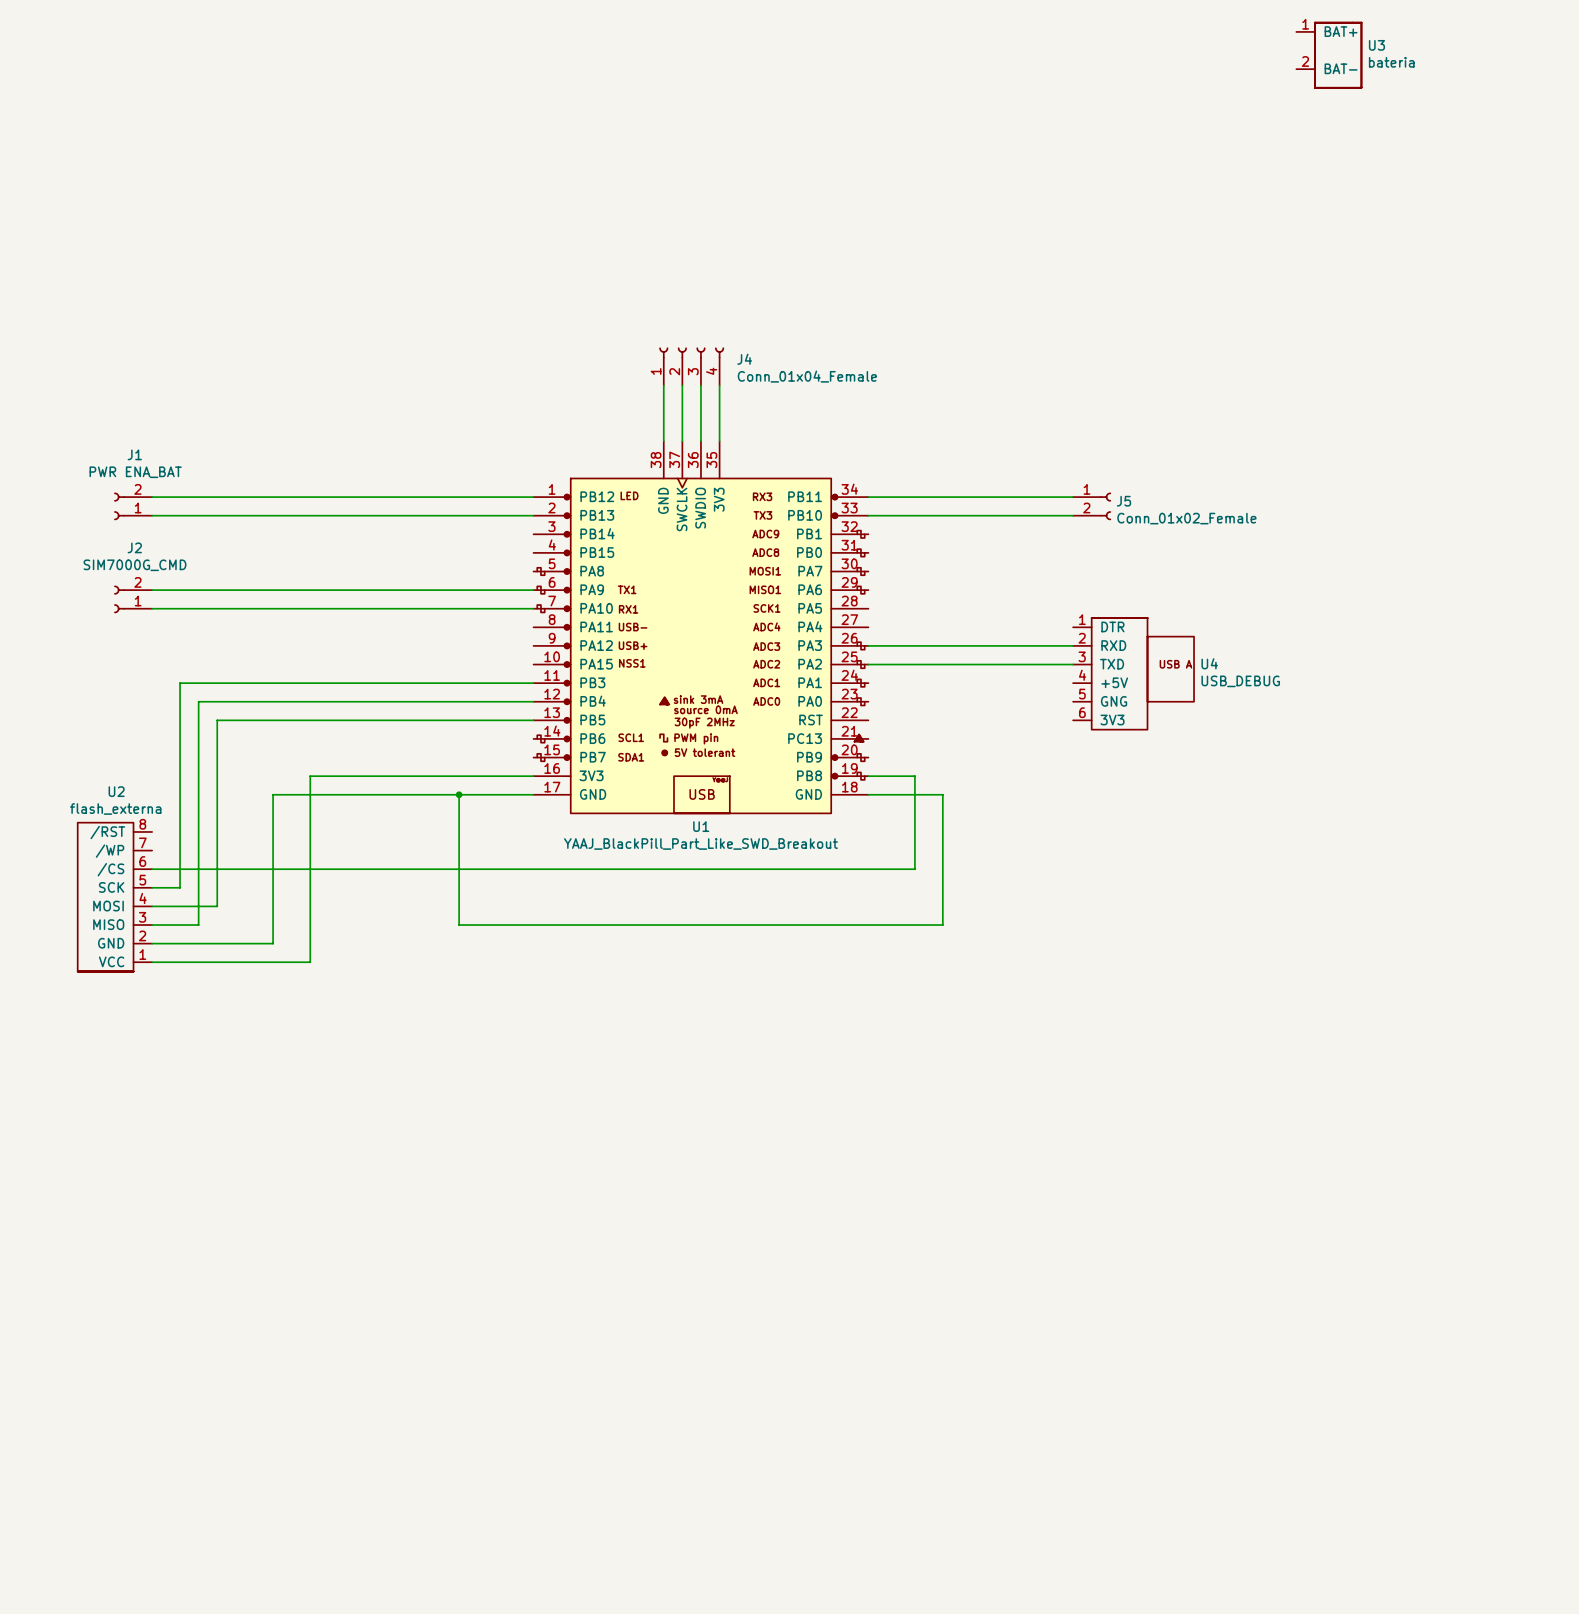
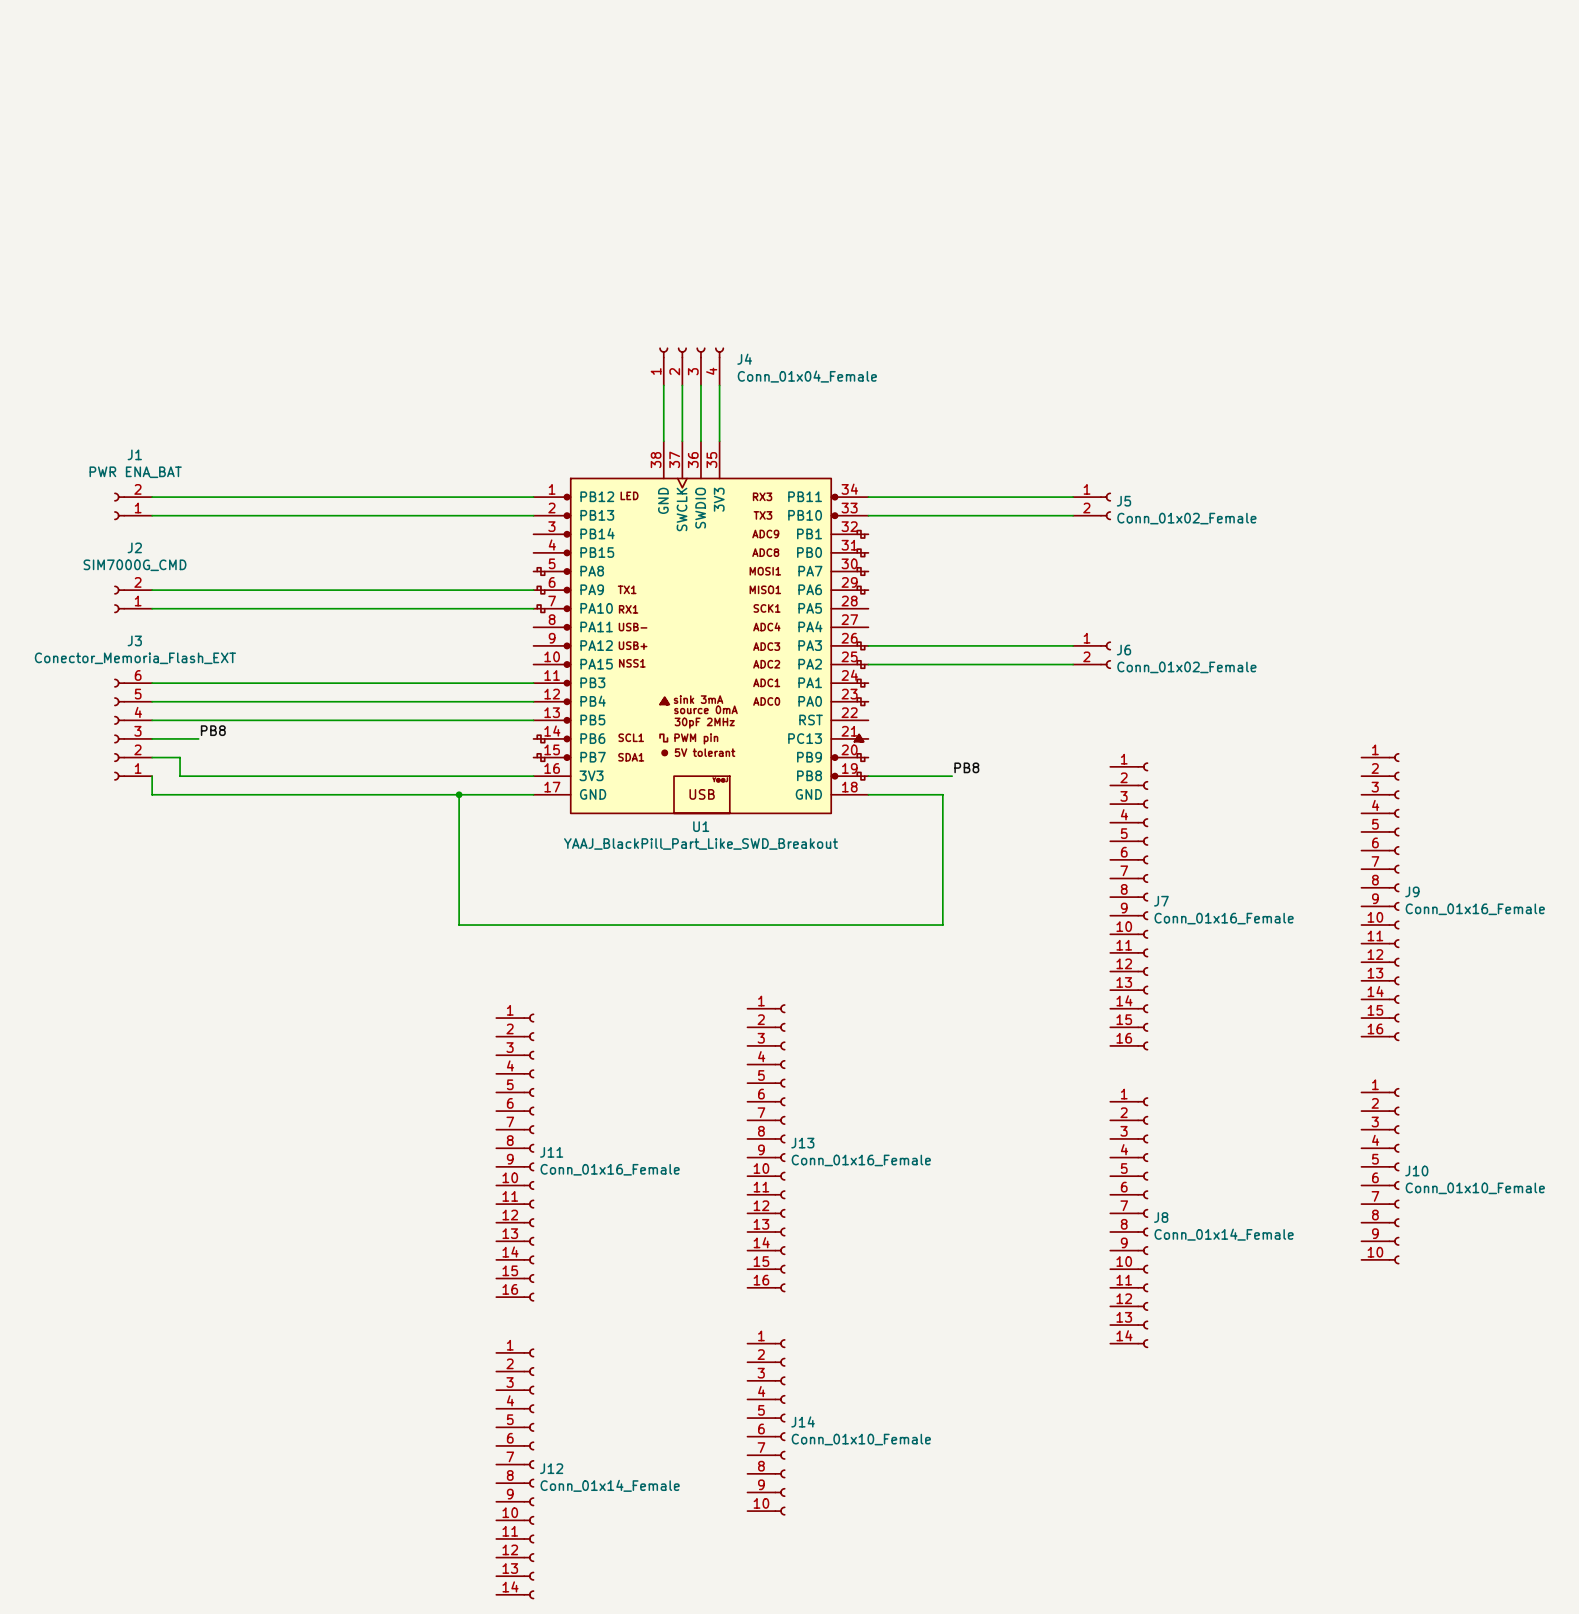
U3: bateria (1328, 55) -> none
J6: none -> Conn_01x02_Female (1091, 655)
U4: USB_DEBUG (1133, 673) -> none
wire: (180, 683) (180, 757) -> (180, 683) (152, 683)
wire: (198, 701) (198, 925) (152, 925) -> (198, 701) (152, 701)
wire: (217, 720) (217, 906) (152, 906) -> (217, 720) (152, 720)
J3: none -> Conector_Memoria_Flash_EXT (133, 729)
label: none -> PB8 (213, 730)
wire: none -> (152, 738) (198, 738)
wire: none -> (152, 757) (180, 757)
label: none -> PB8 (966, 767)
wire: (180, 776) (180, 887) (152, 887) -> none
wire: (310, 776) (310, 962) (152, 962) -> (310, 776) (180, 776)
wire: (914, 776) (914, 869) (152, 869) -> (914, 776) (952, 776)
wire: (273, 794) (273, 943) (152, 943) -> (273, 794) (152, 794) (152, 776)
U2: flash_externa (114, 897) -> none
J9: none -> Conn_01x16_Female (1380, 897)
J7: none -> Conn_01x16_Female (1129, 906)
J13: none -> Conn_01x16_Female (766, 1148)
J11: none -> Conn_01x16_Female (515, 1157)
J10: none -> Conn_01x10_Female (1380, 1176)
J8: none -> Conn_01x14_Female (1129, 1222)
J14: none -> Conn_01x10_Female (766, 1427)
J12: none -> Conn_01x14_Female (515, 1473)

